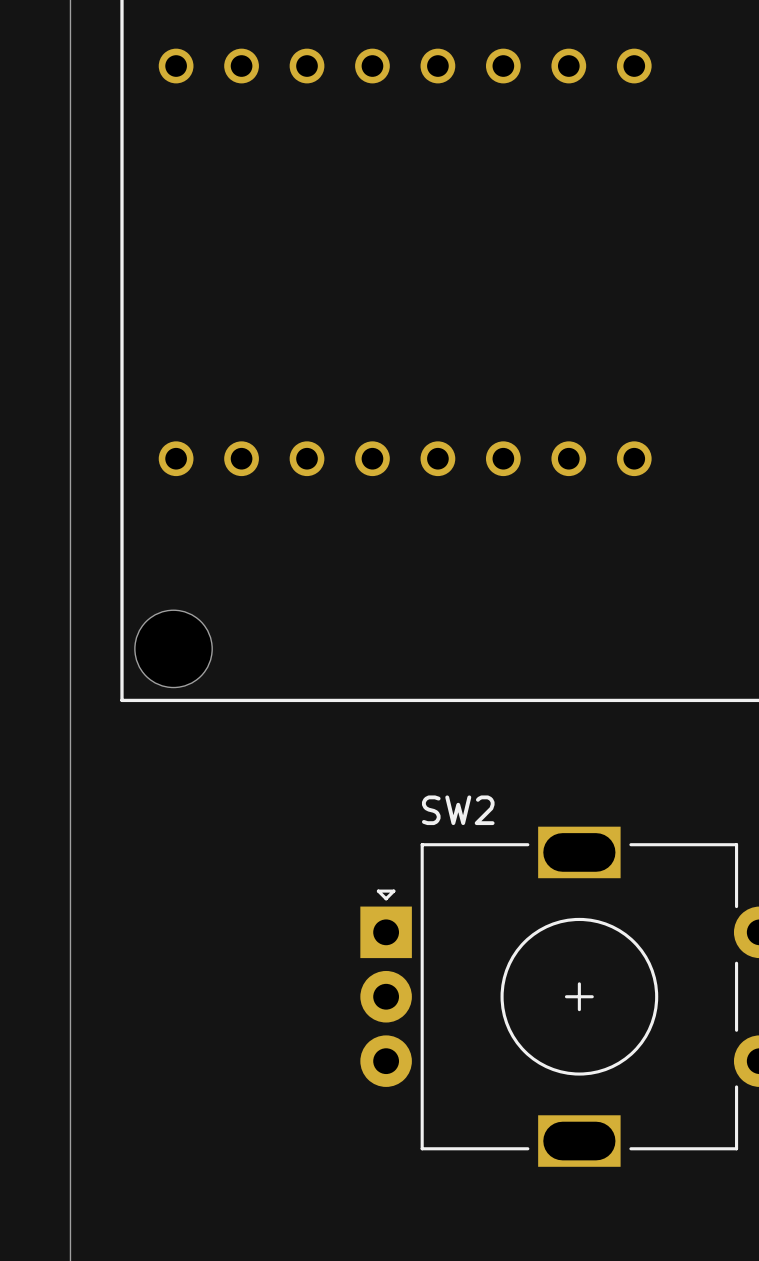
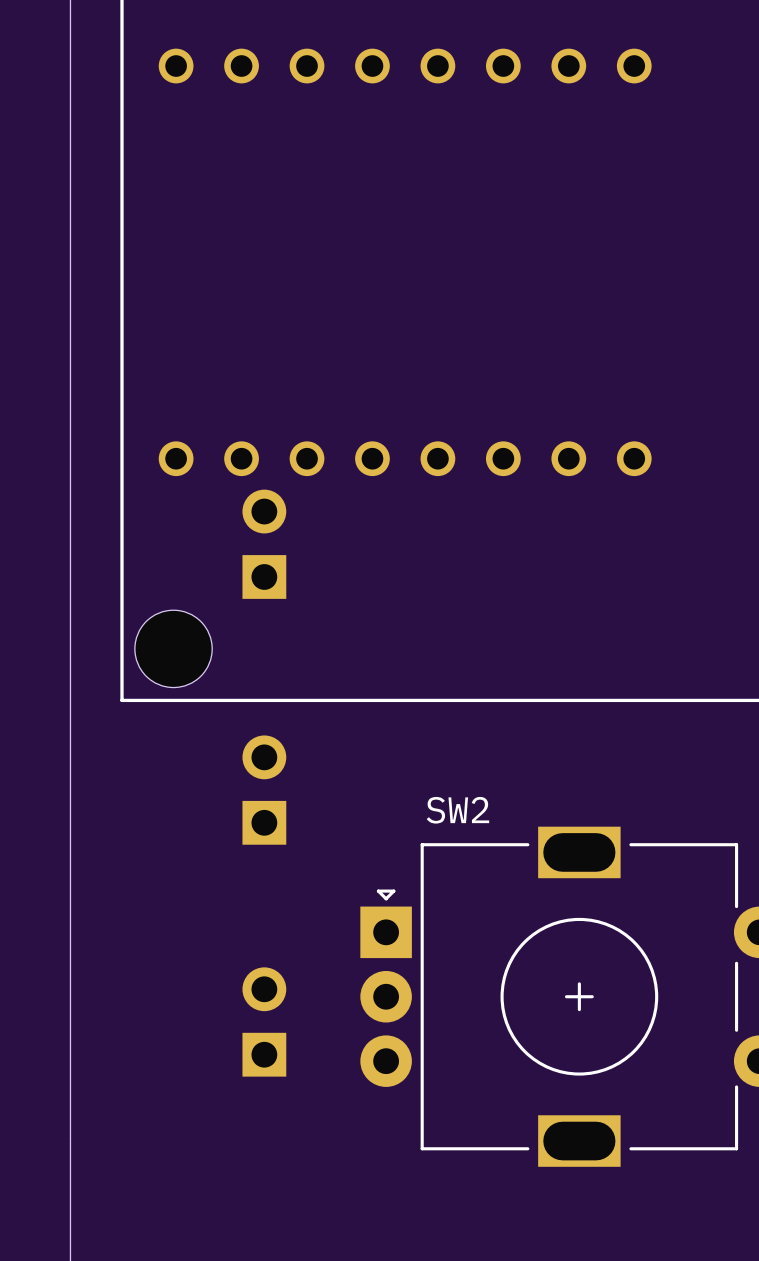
part: none -> (264, 544)
part: none -> (264, 790)
part: none -> (264, 1021)

